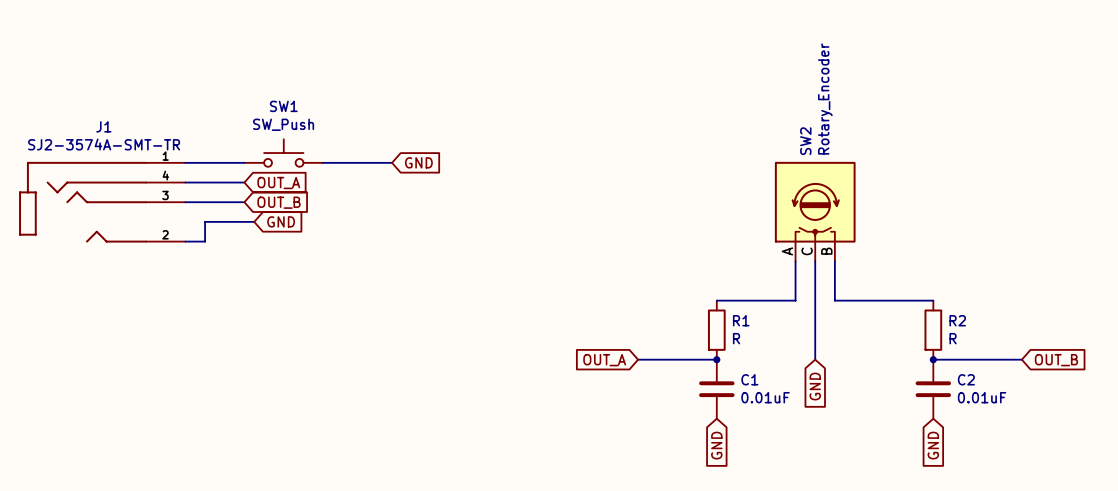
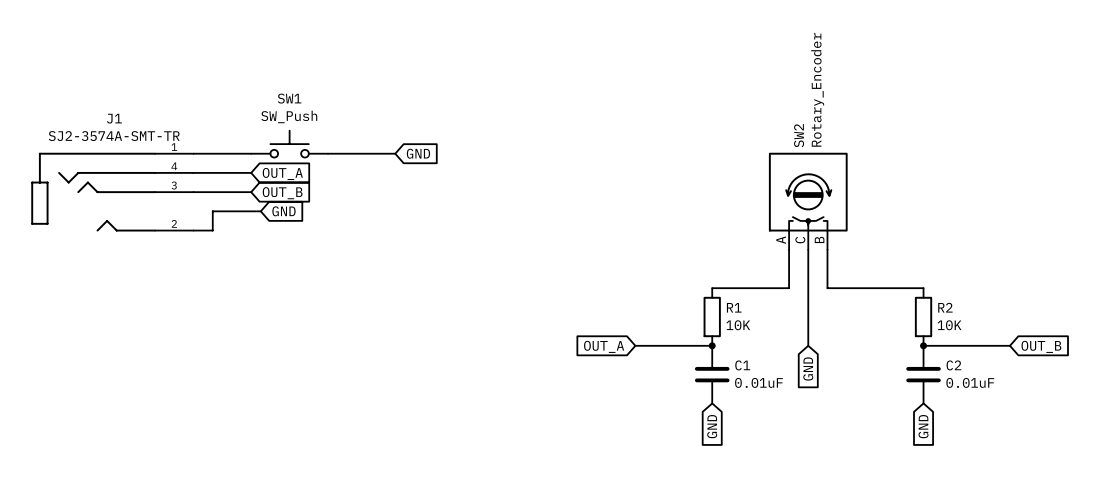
R1 value: R (736, 338) -> 10K (738, 325)
R2 value: R (953, 338) -> 10K (949, 325)

